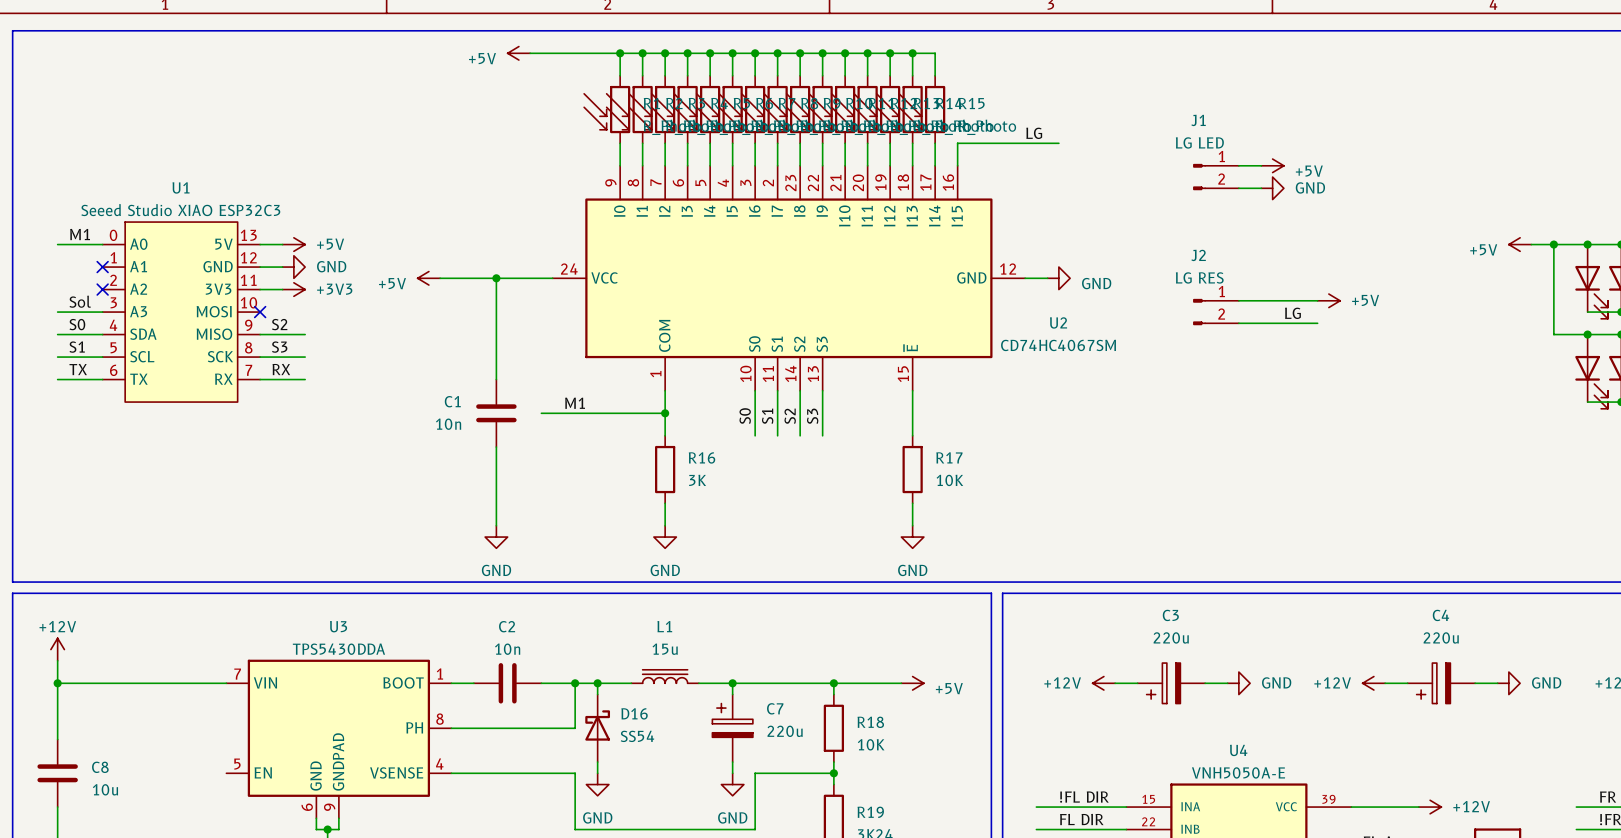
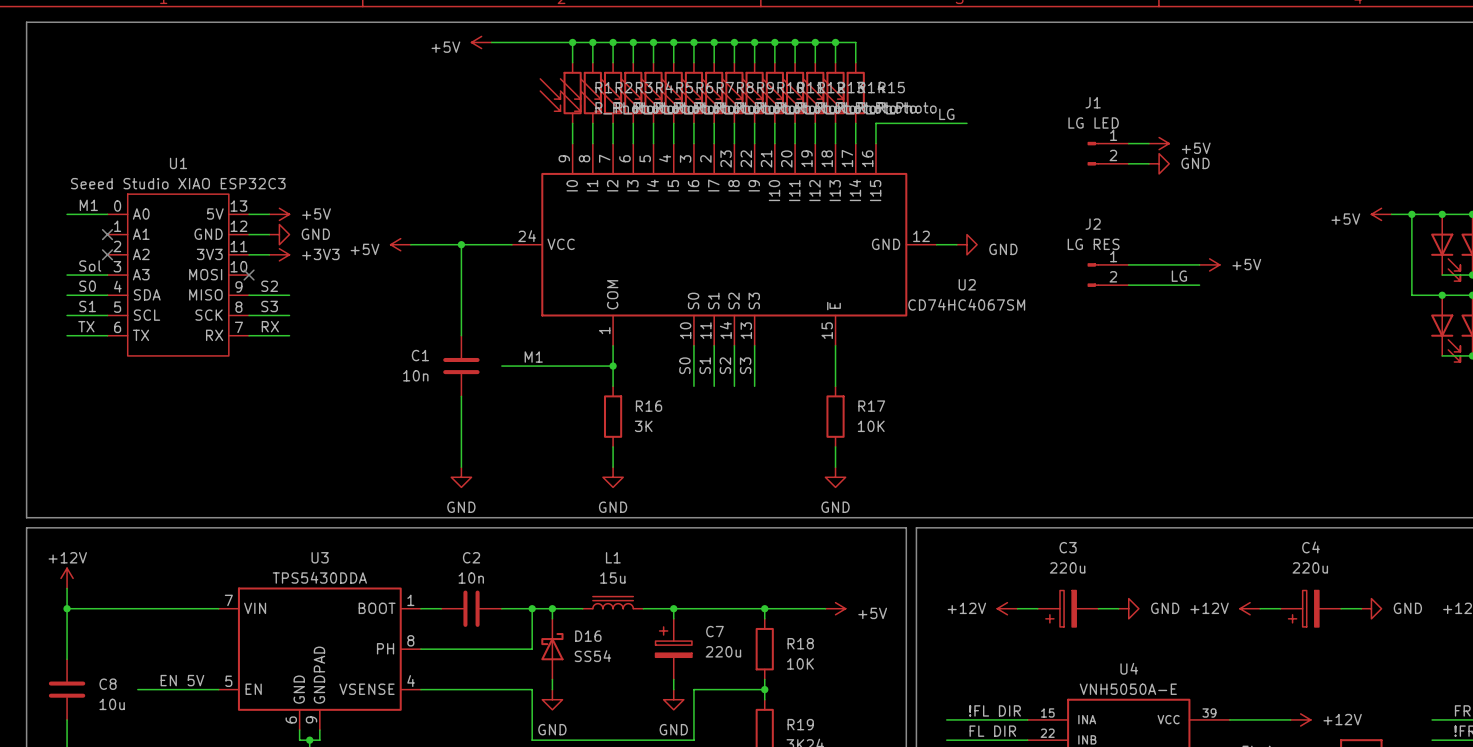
label: none -> EN 5V (182, 680)
wire: none -> (137, 689) (218, 689)

